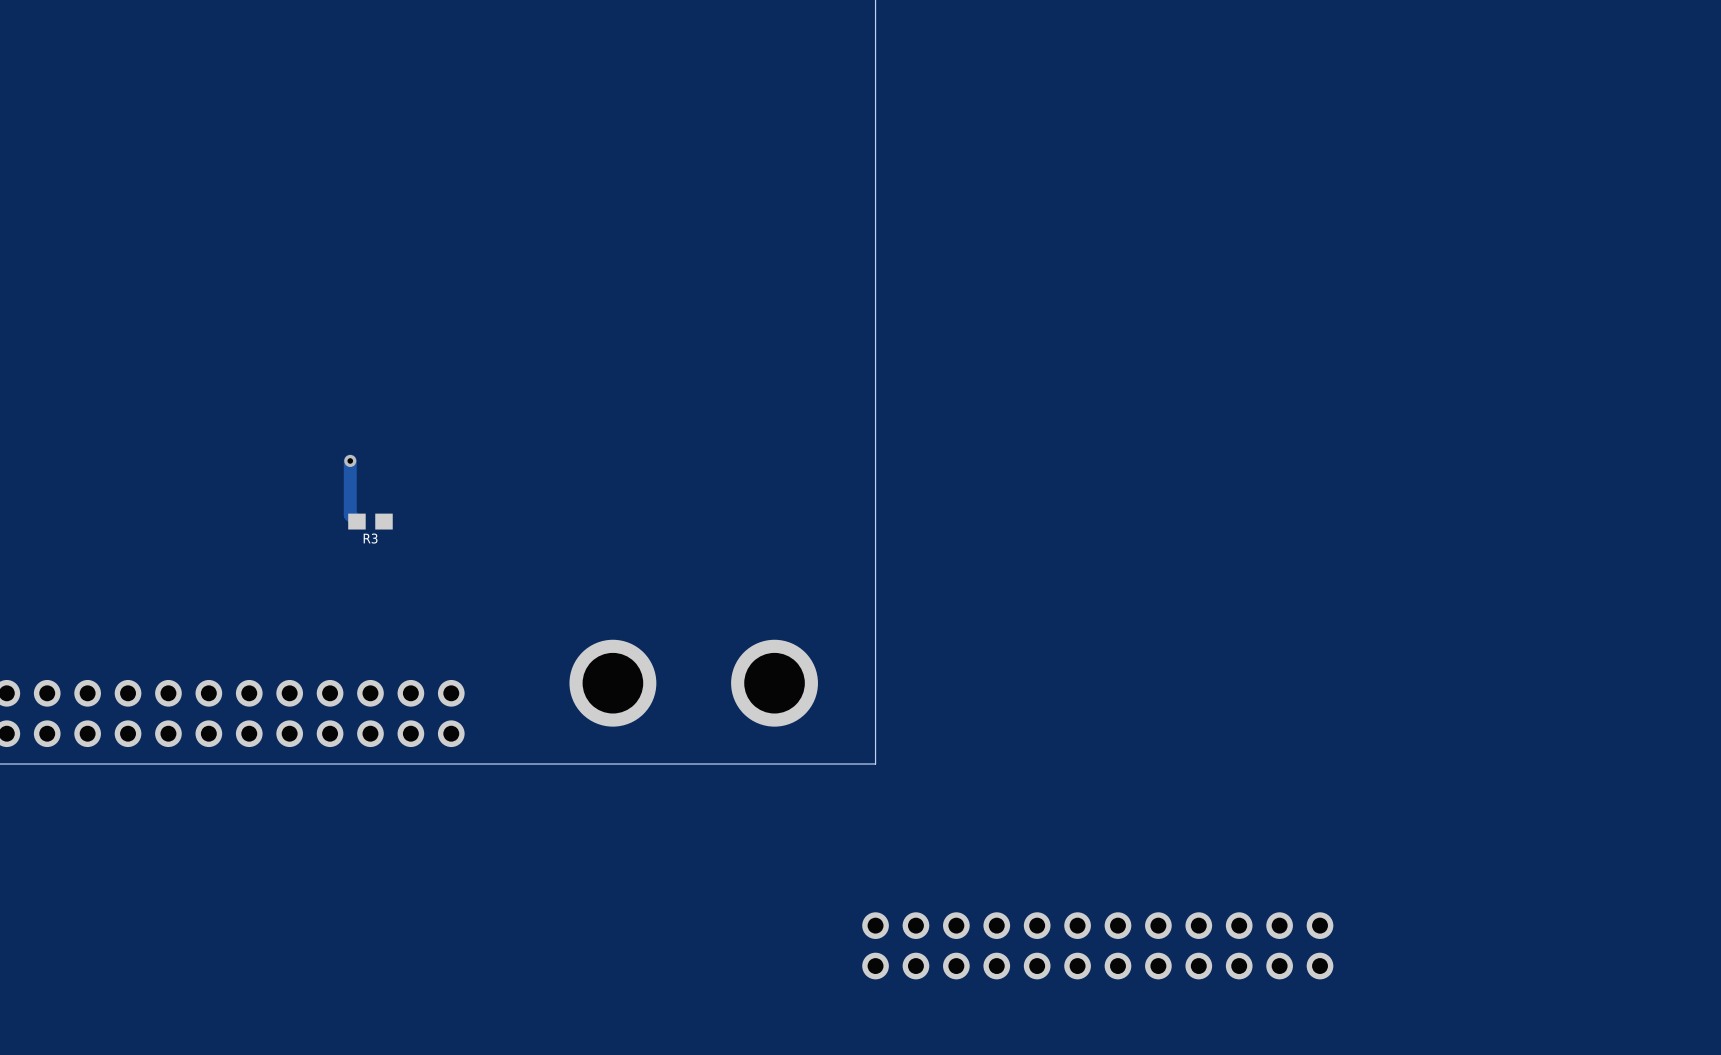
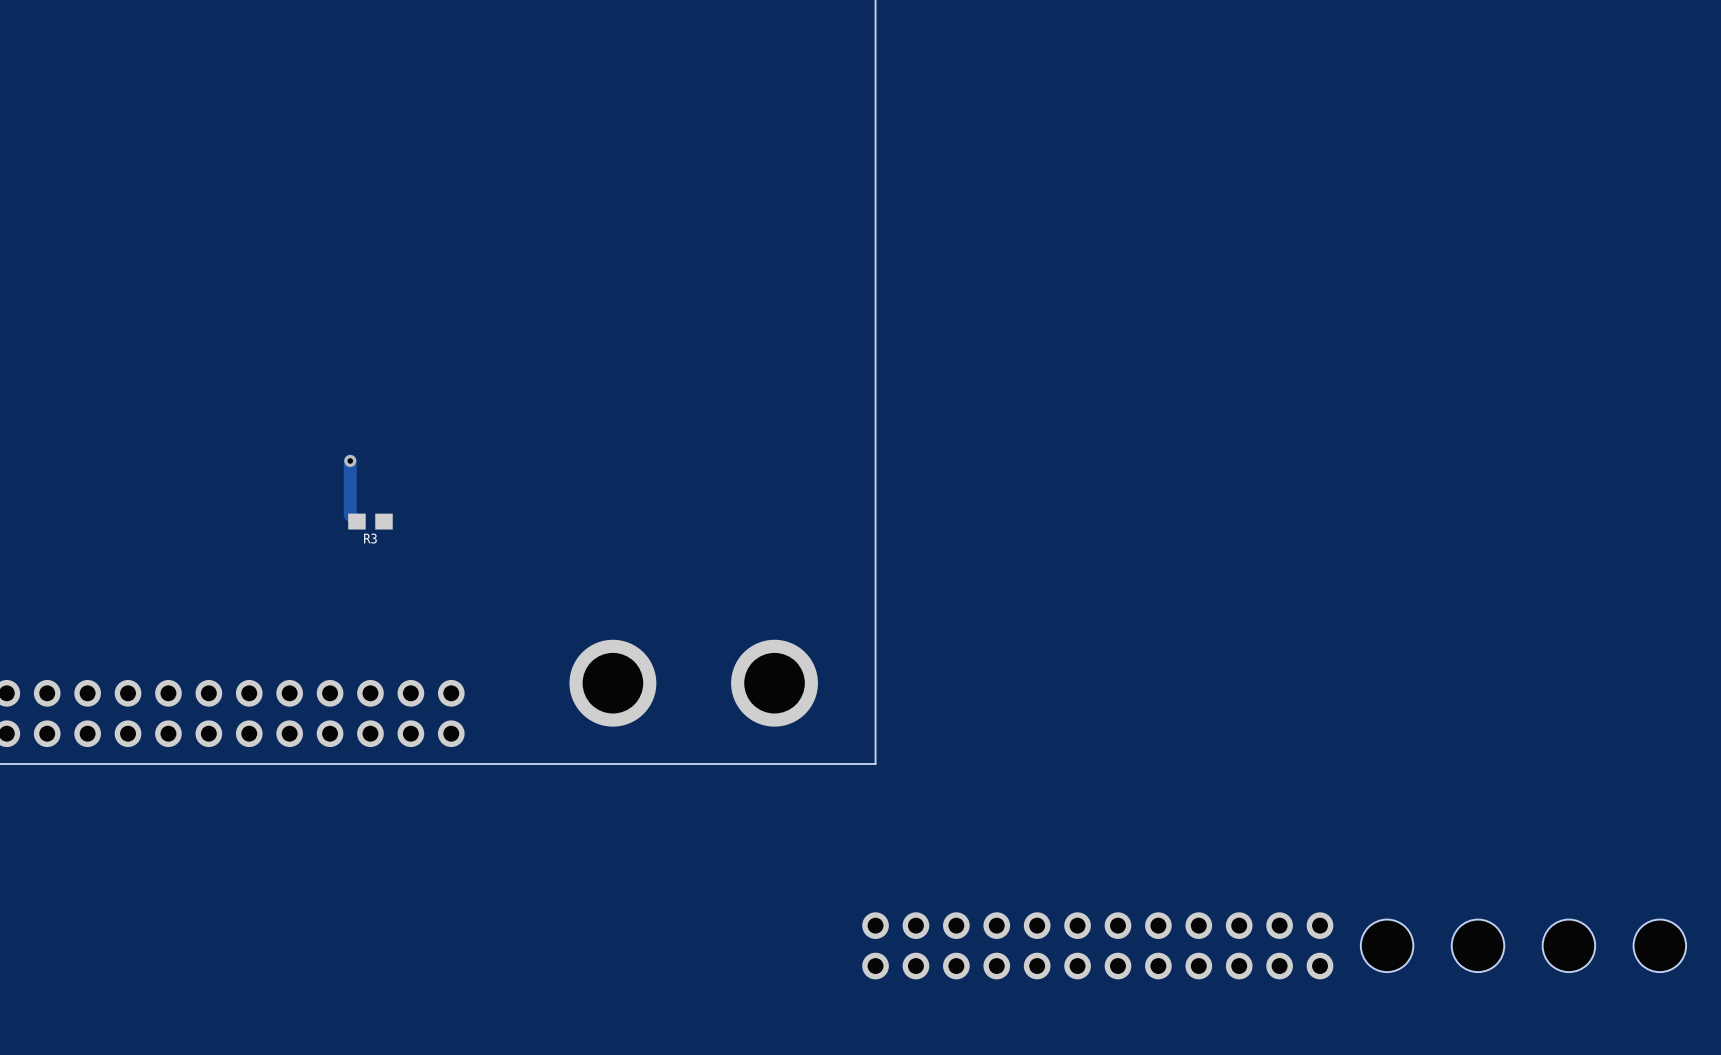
part: none -> (1387, 945)
part: none -> (1478, 945)
part: none -> (1568, 945)
part: none -> (1659, 945)

